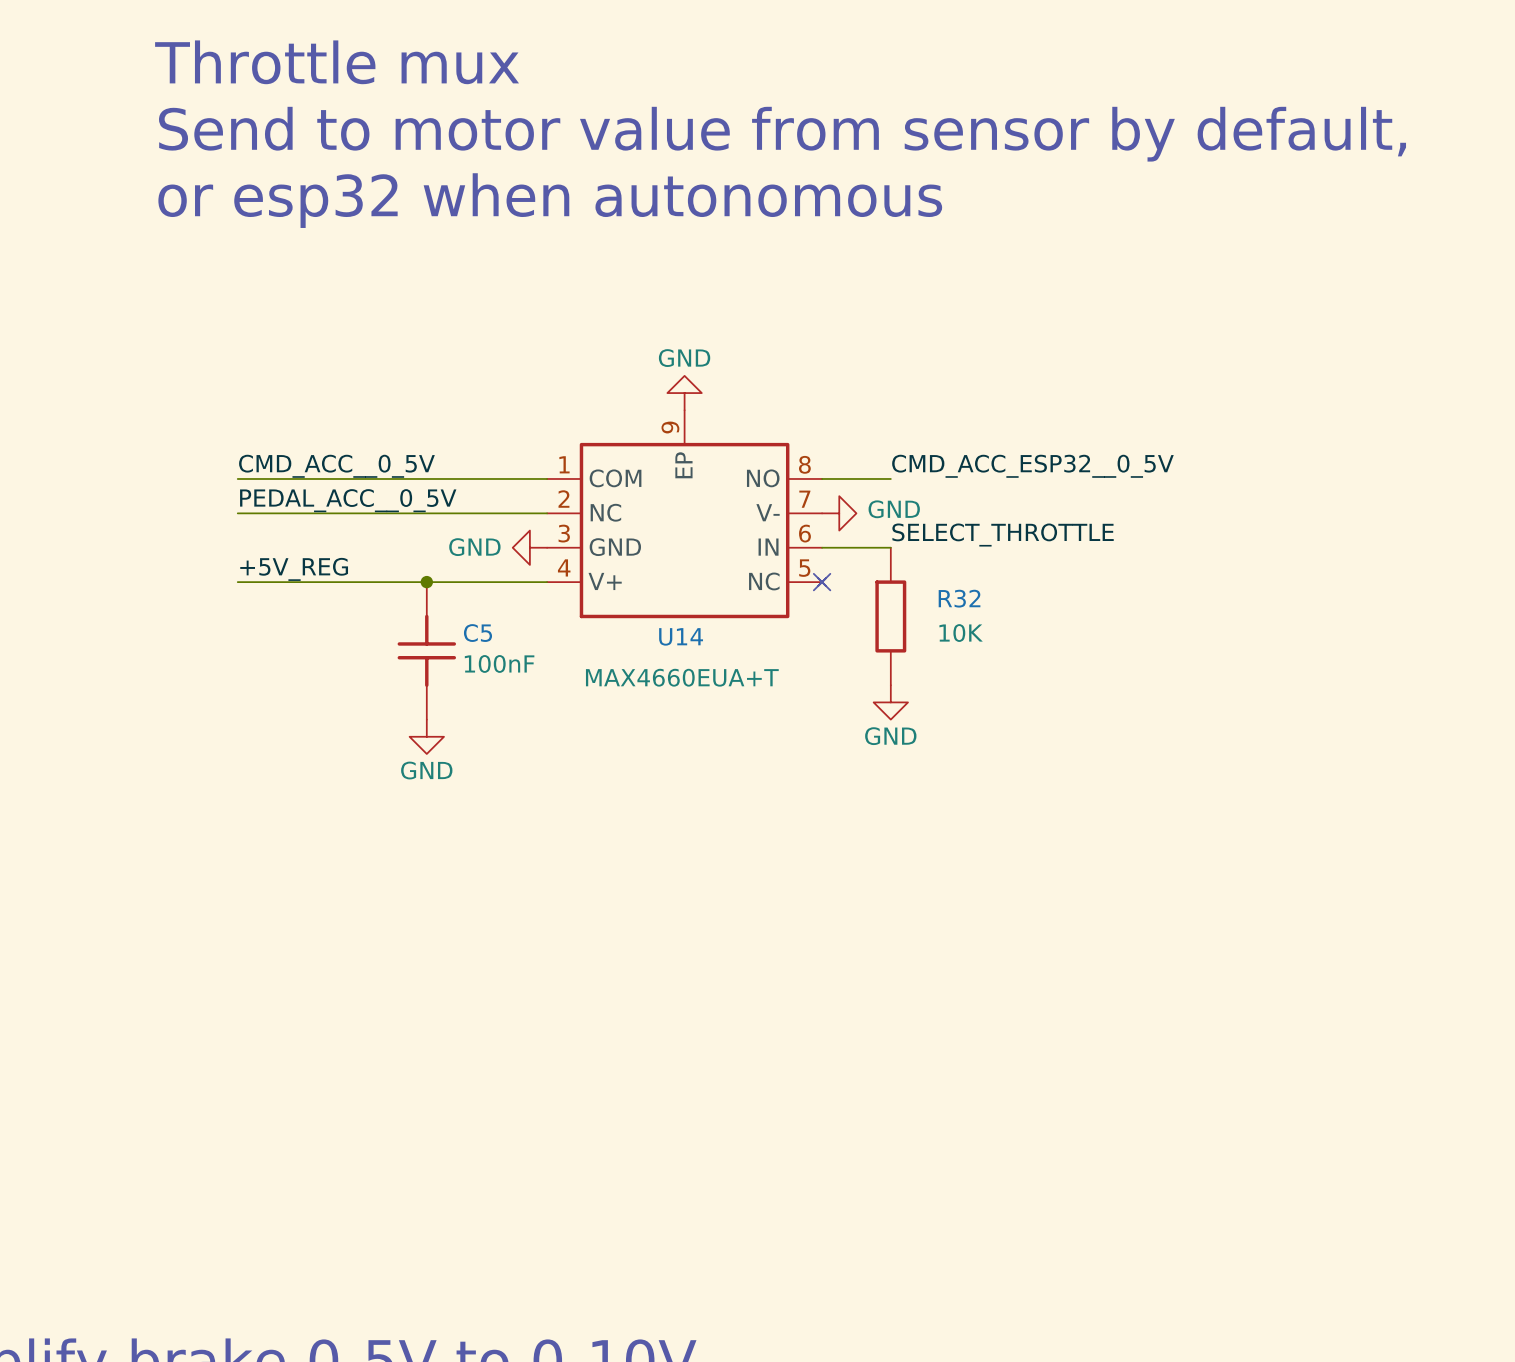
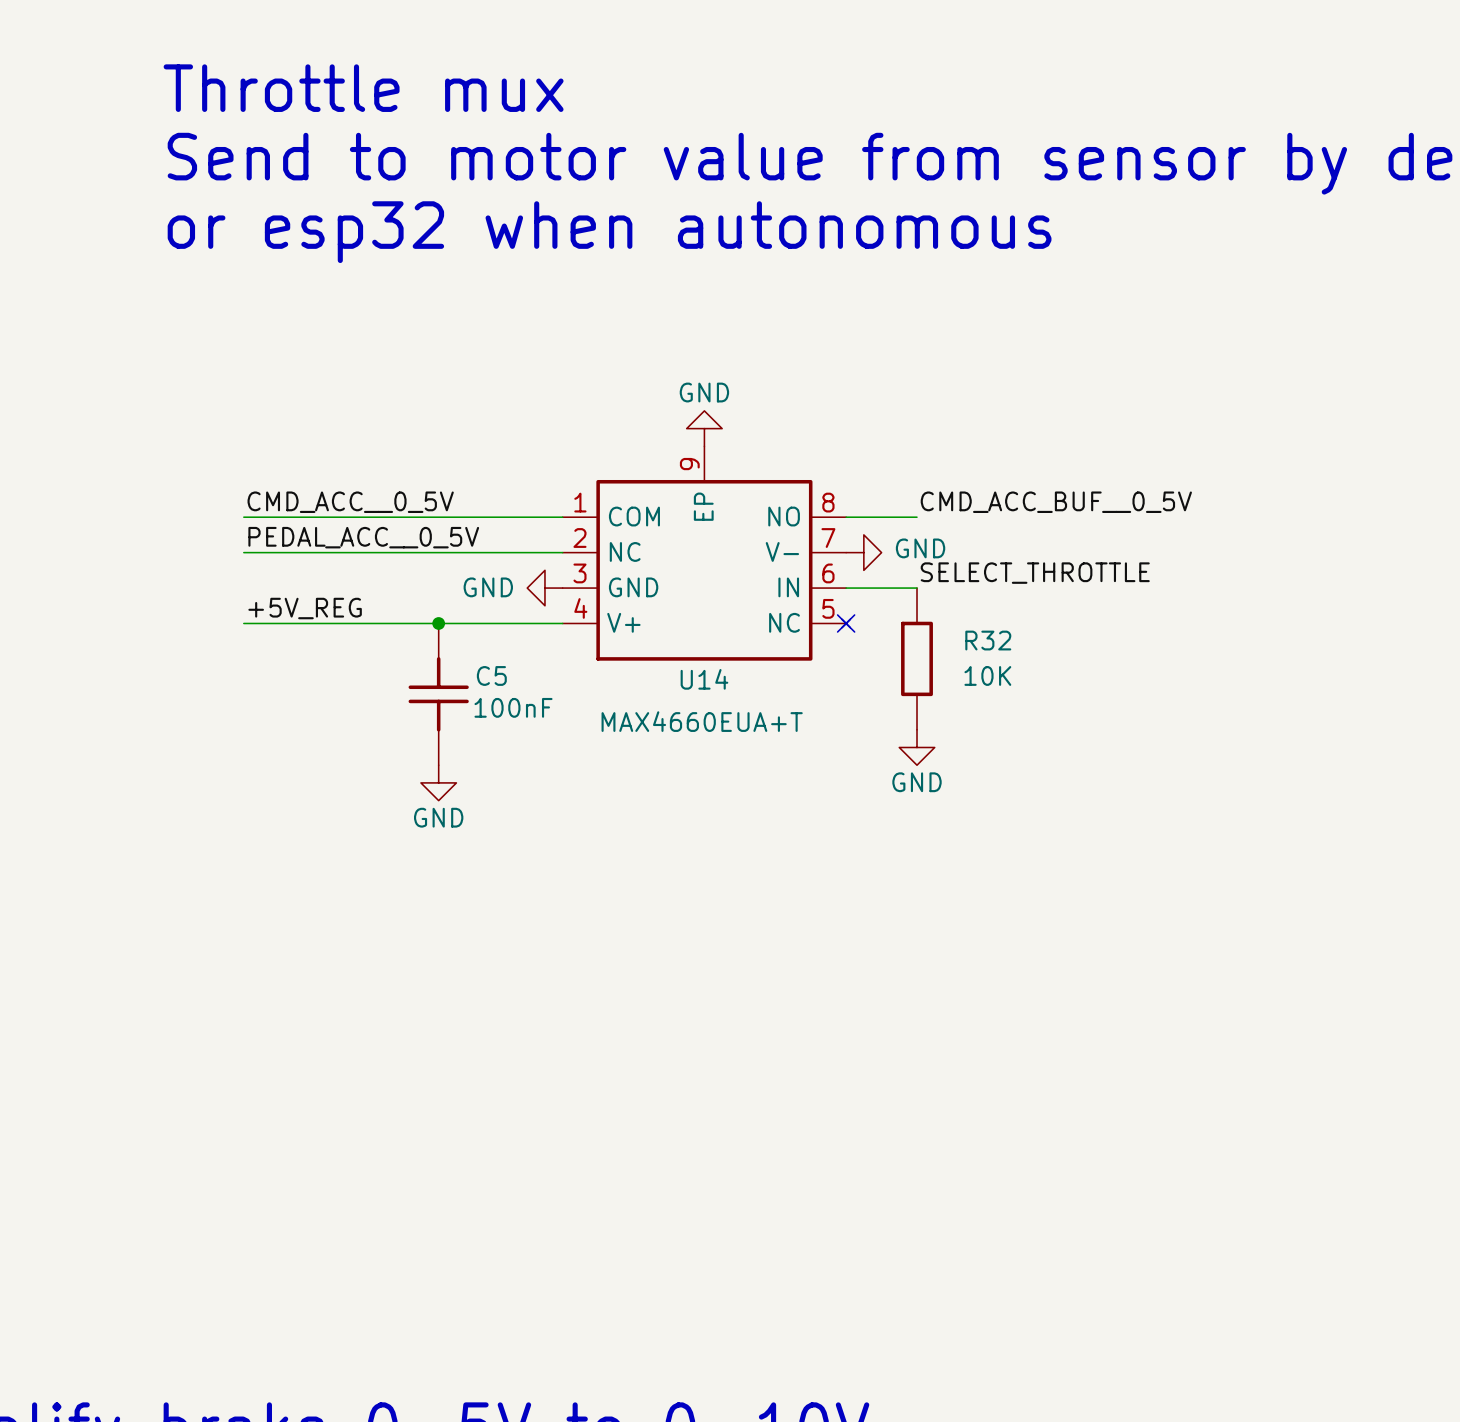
label: CMD_ACC_ESP32__0_5V (1032, 466) -> CMD_ACC_BUF__0_5V (1056, 502)

